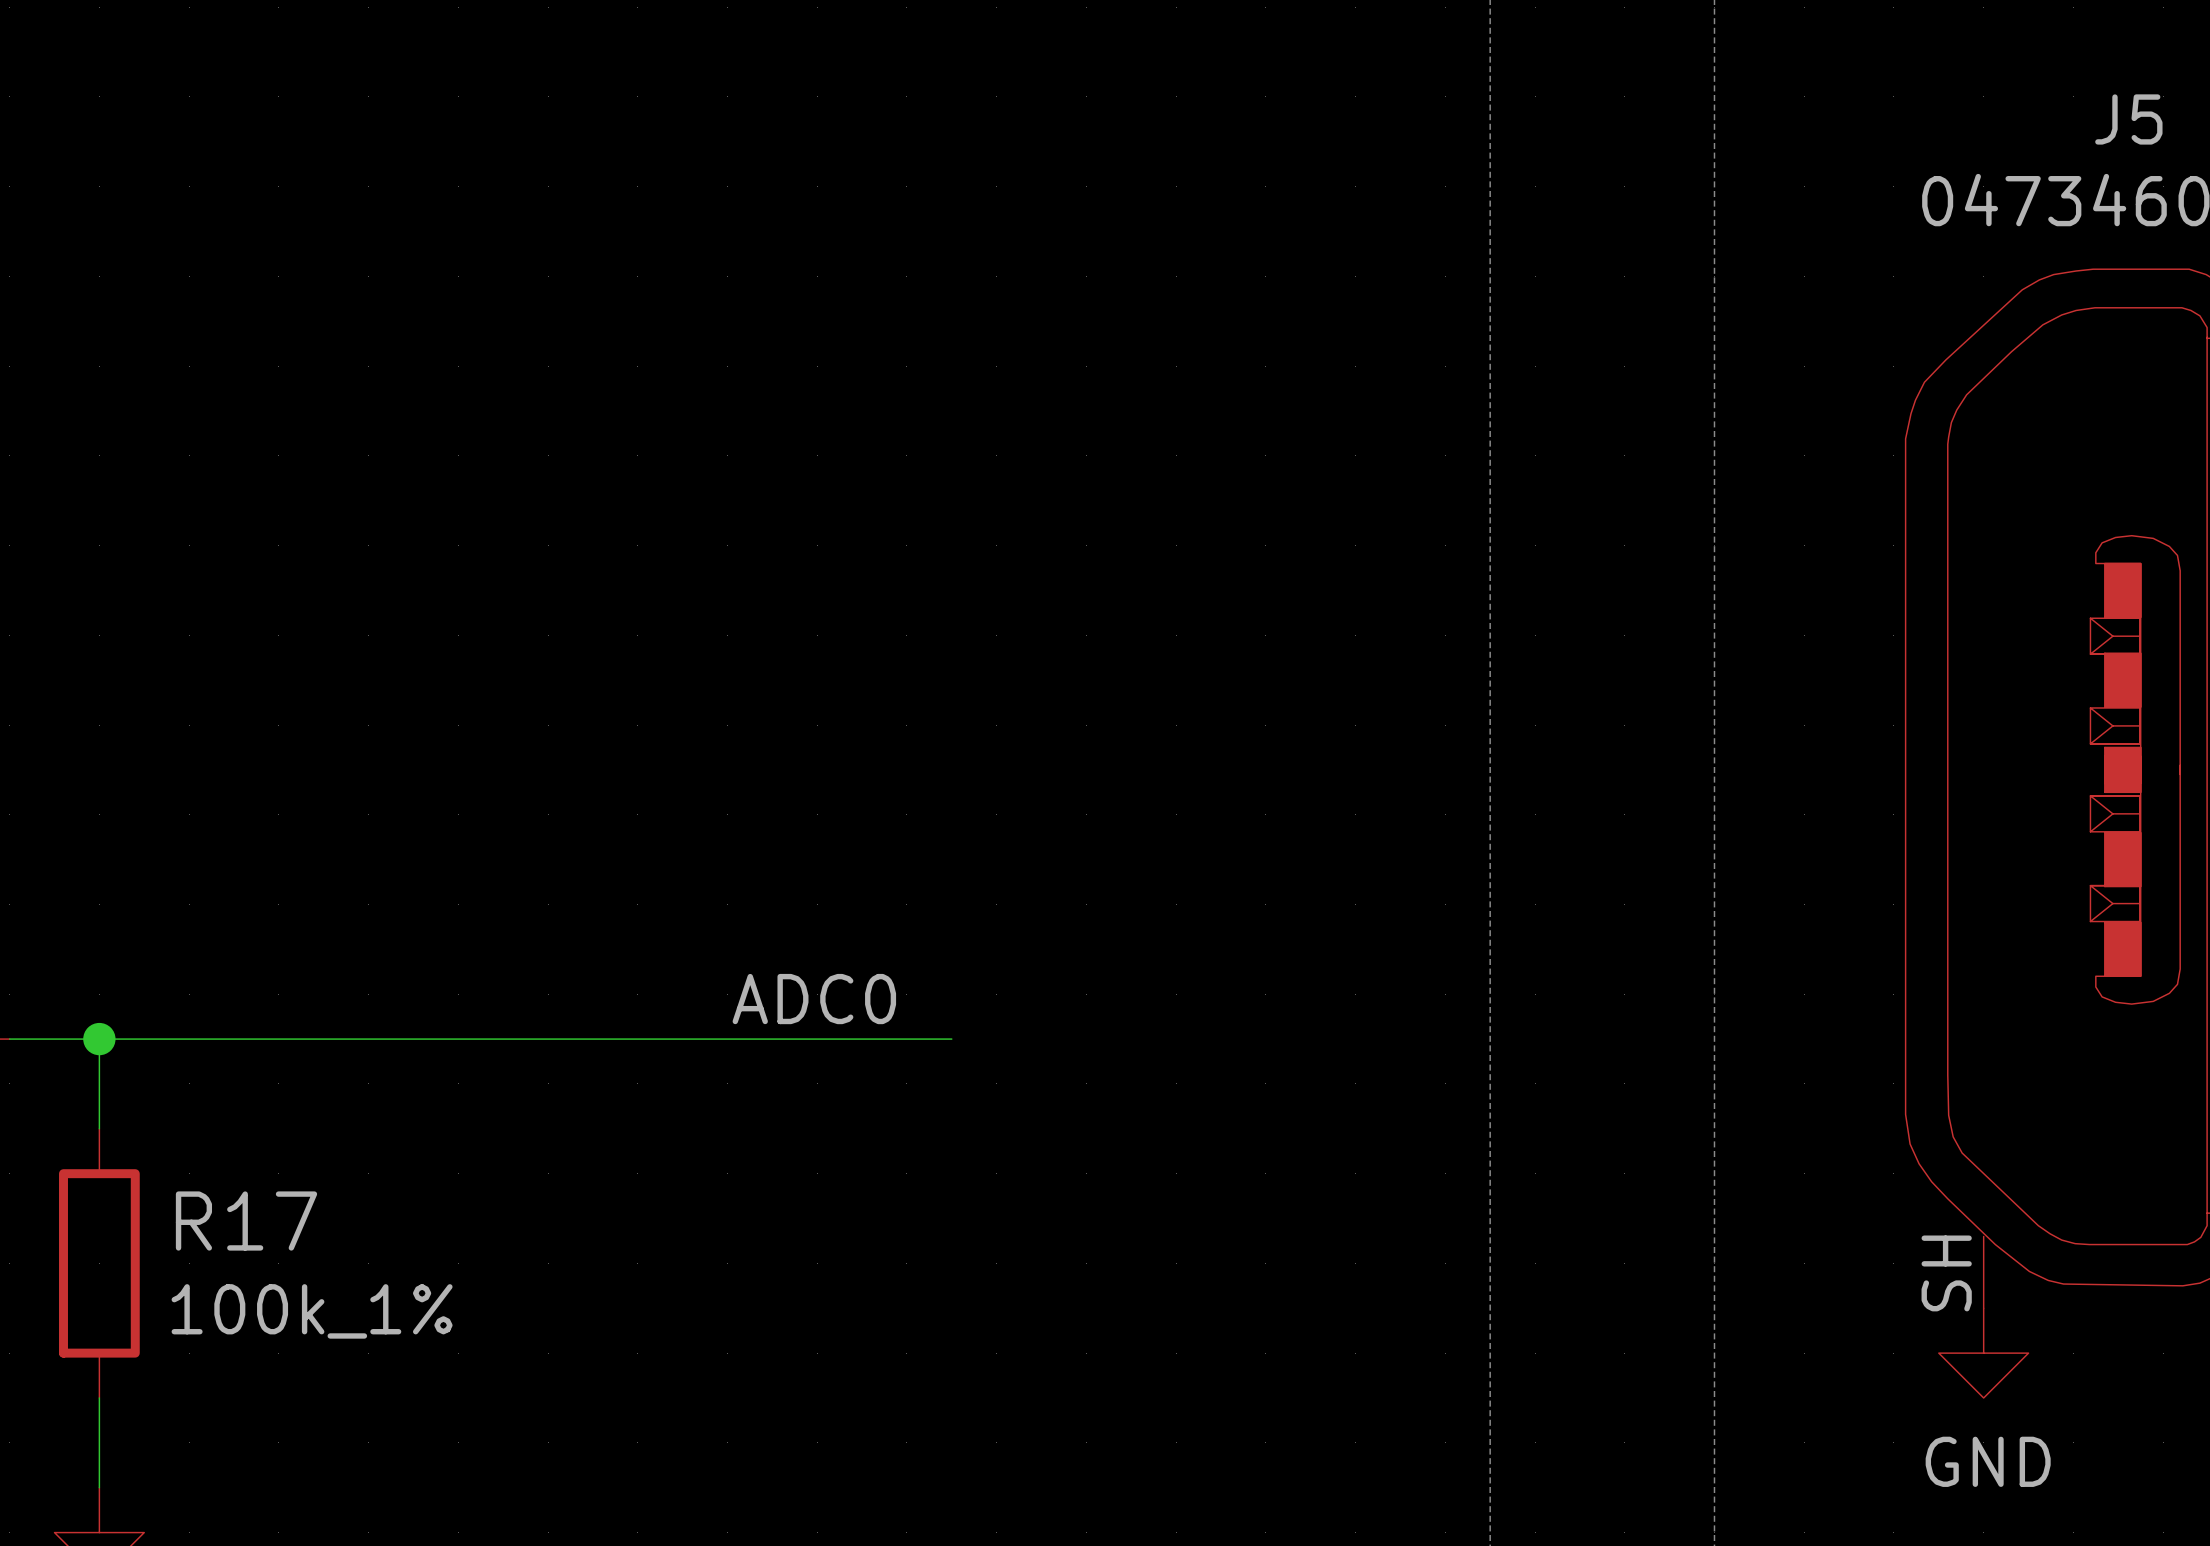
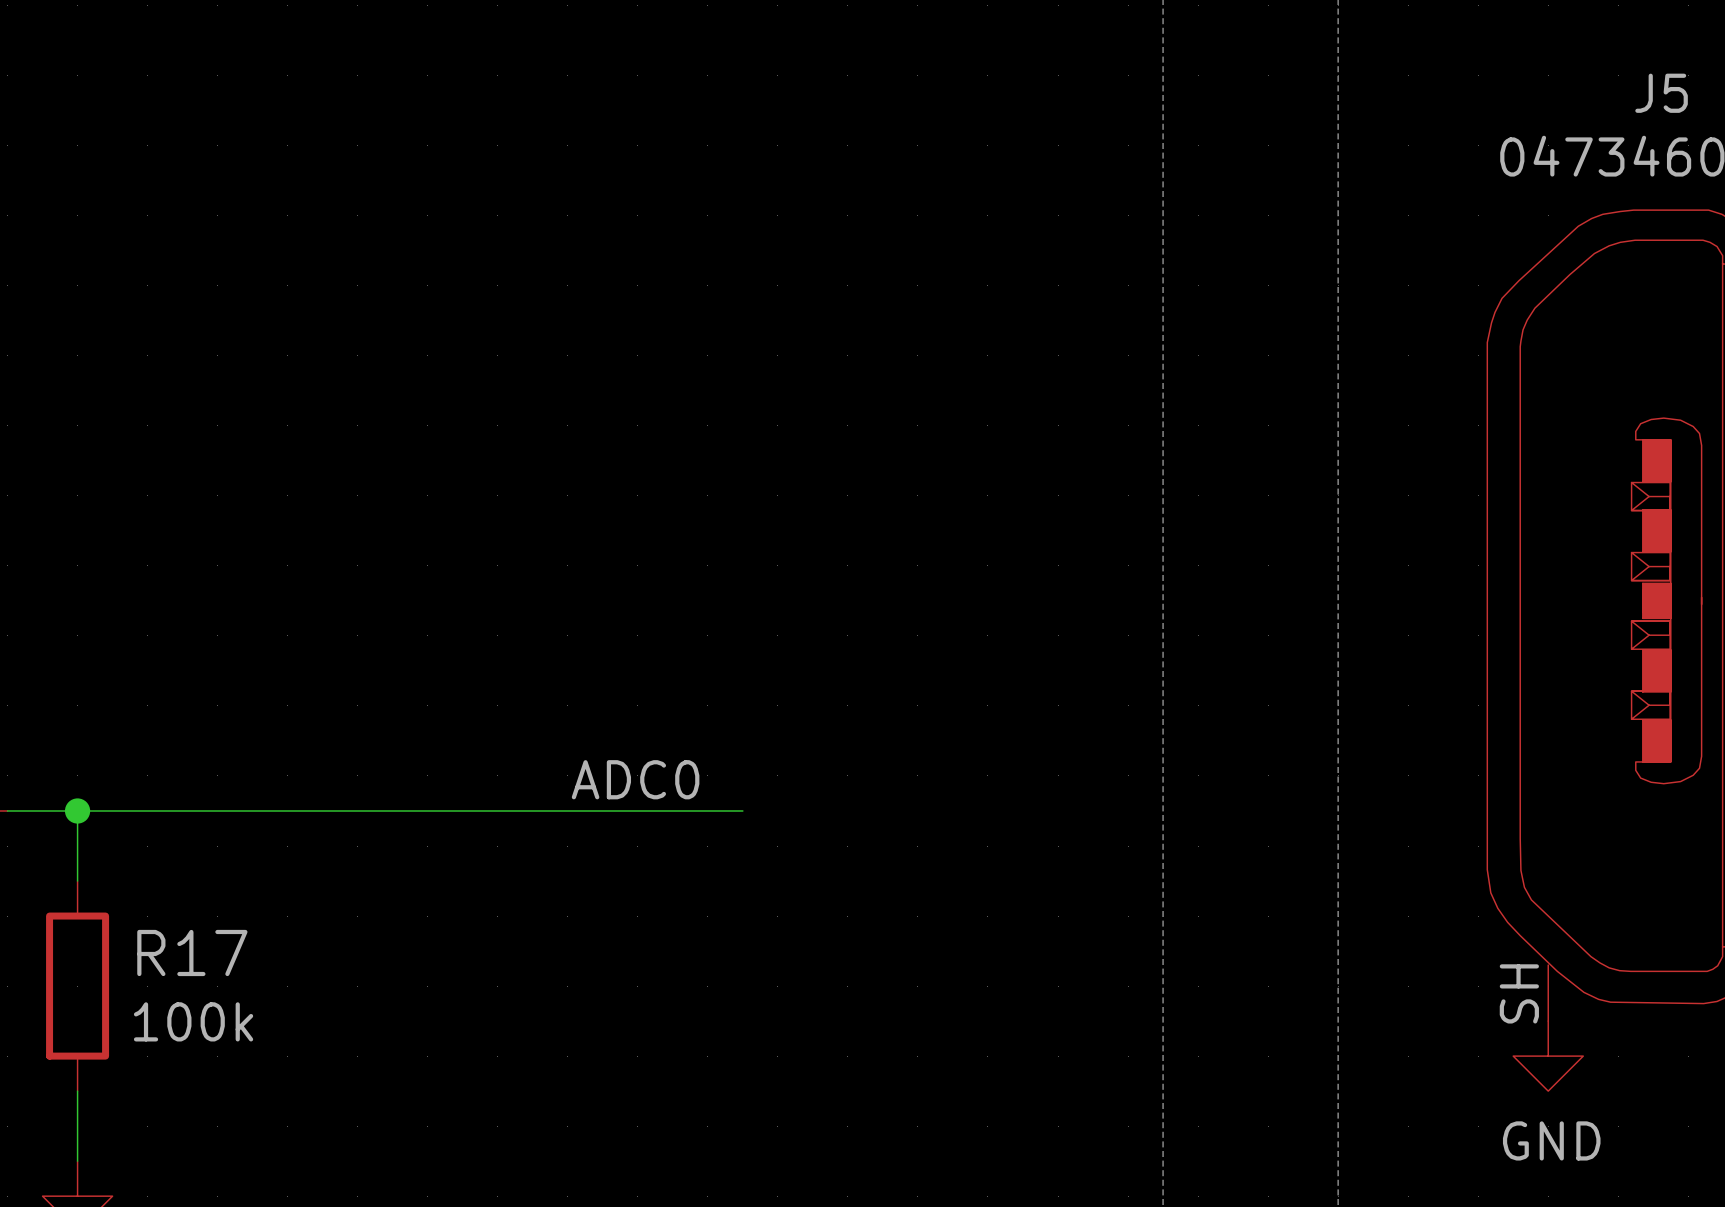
R17 text: 100k_1% (312, 1311) -> 100k (193, 1021)

